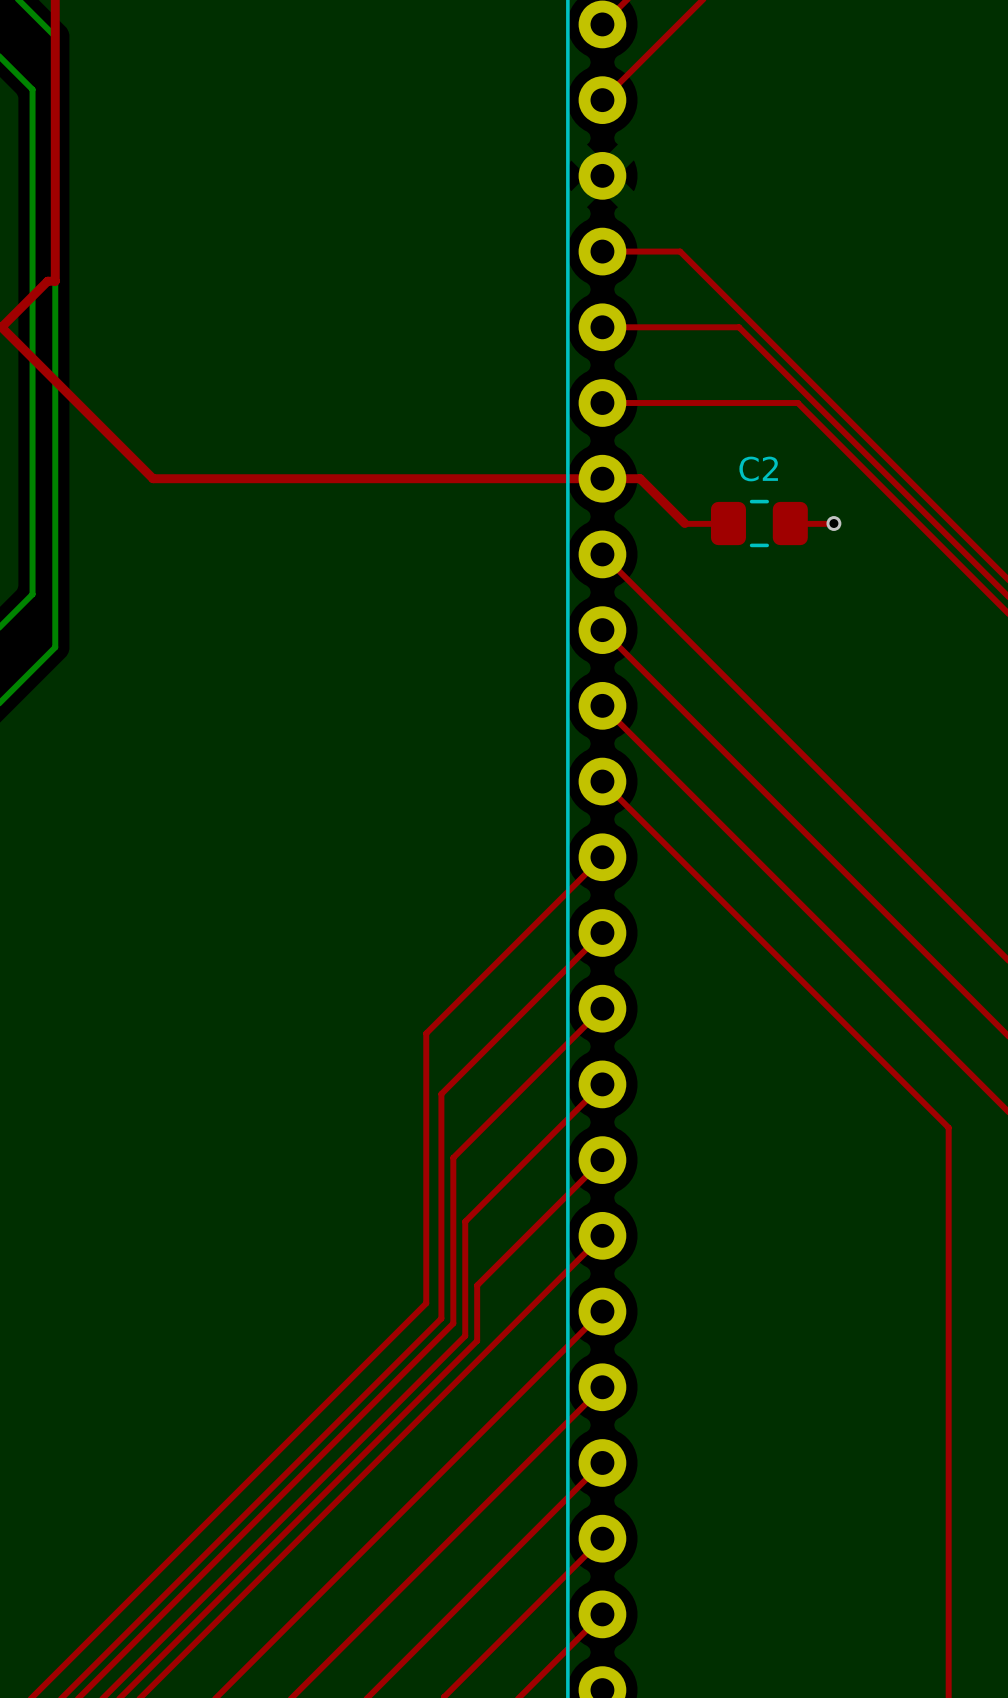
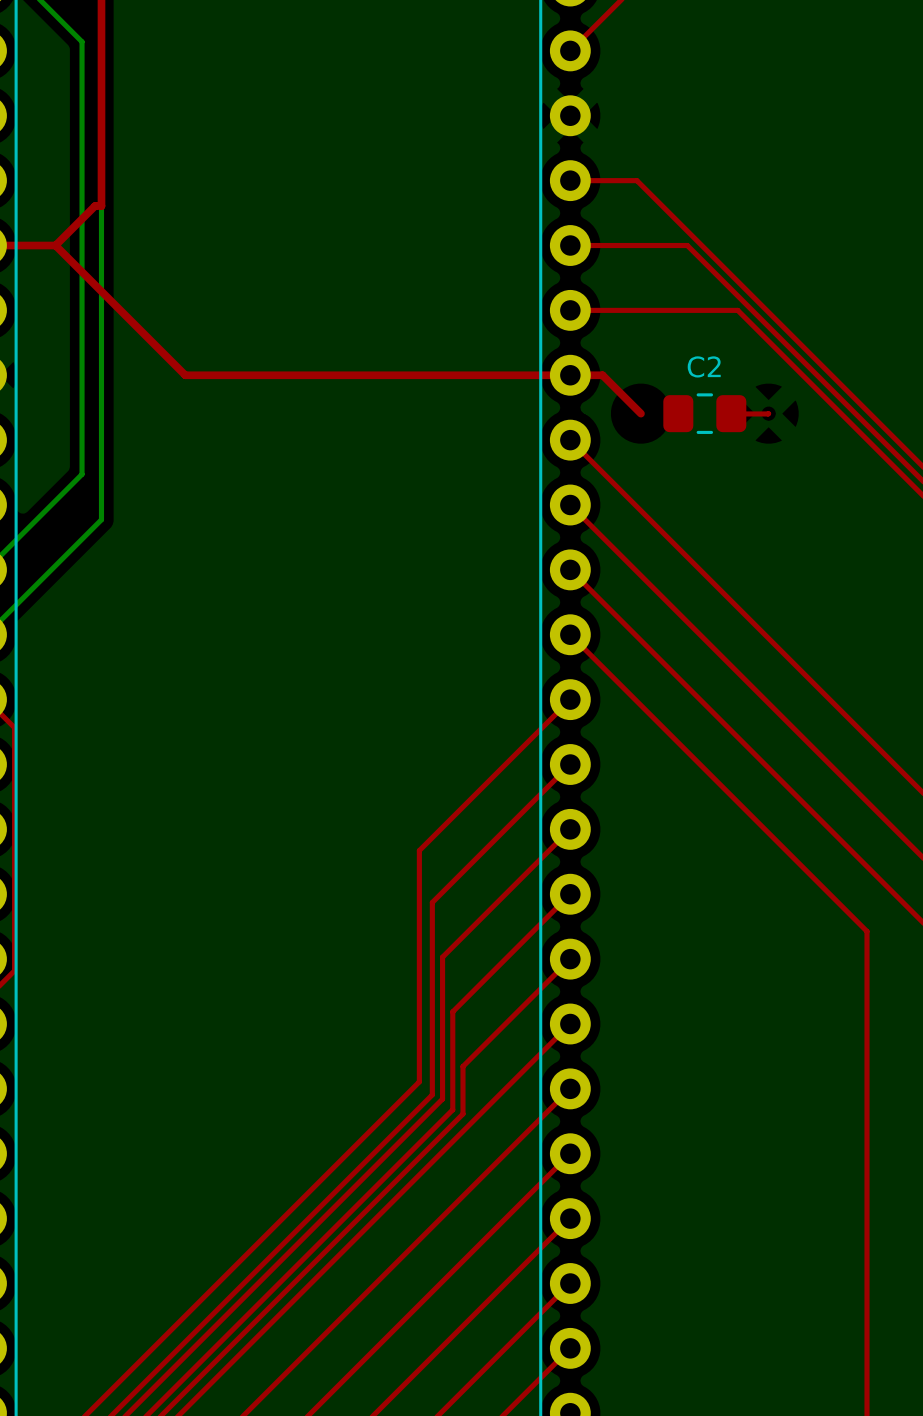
top track: (684, 523) (728, 523) -> none
via: (833, 523) -> none

